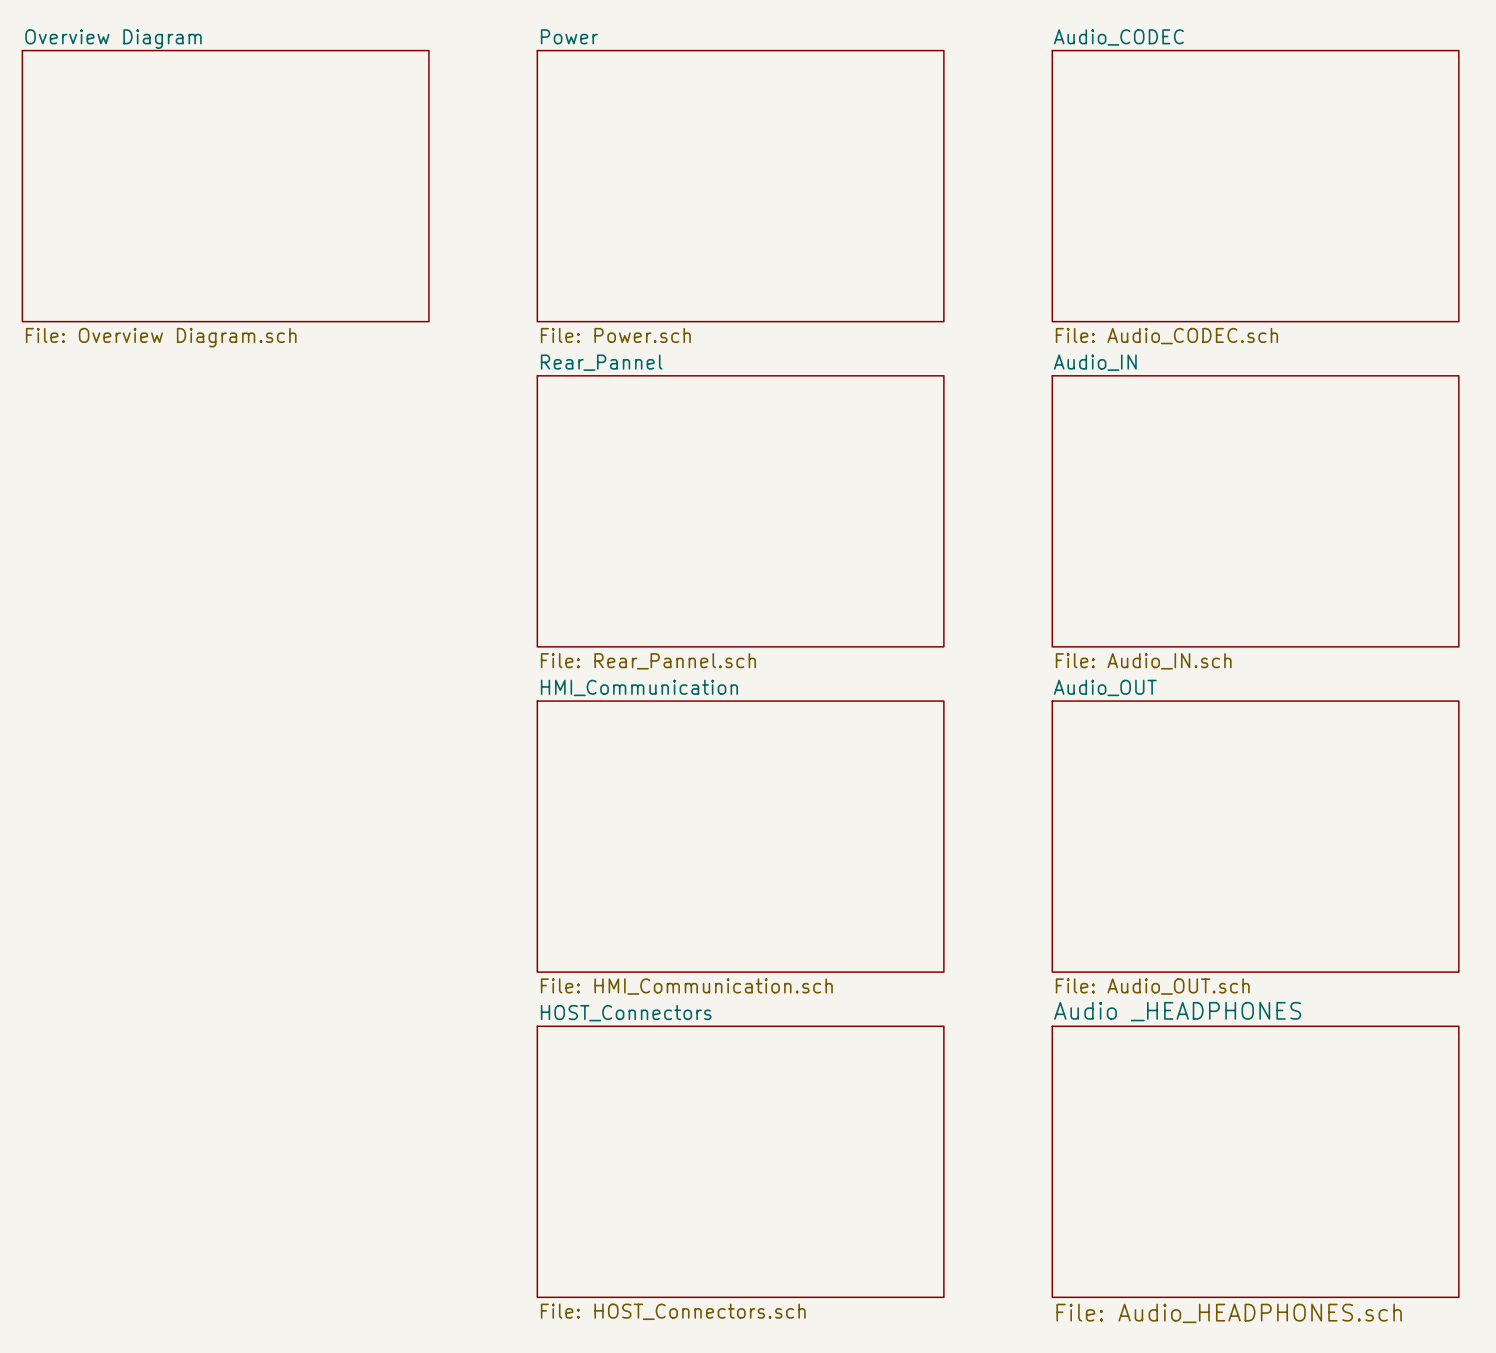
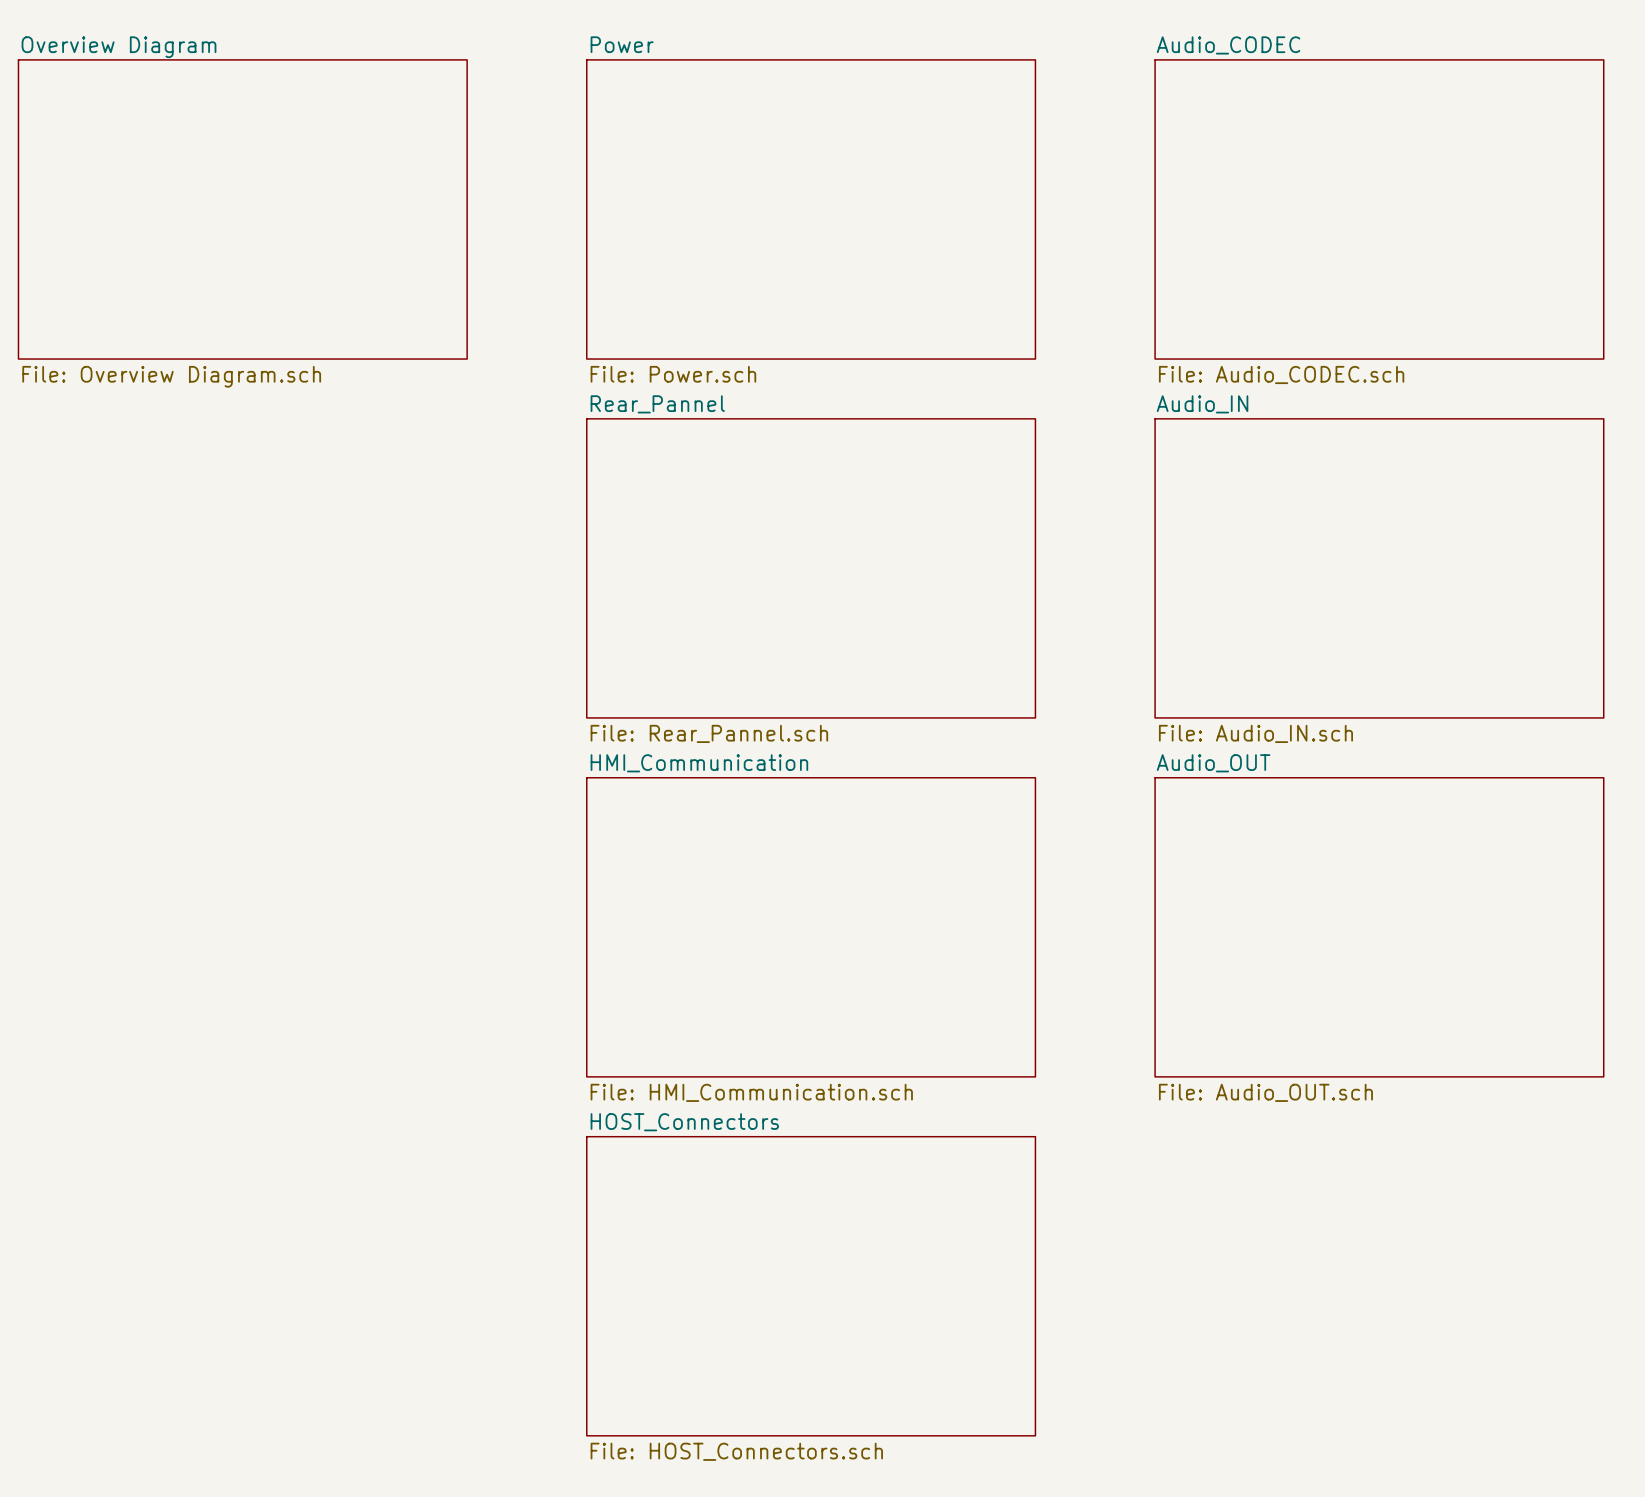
sheet Audio _HEADPHONES: File: Audio_HEADPHONES.sch (1255, 1161) -> none

